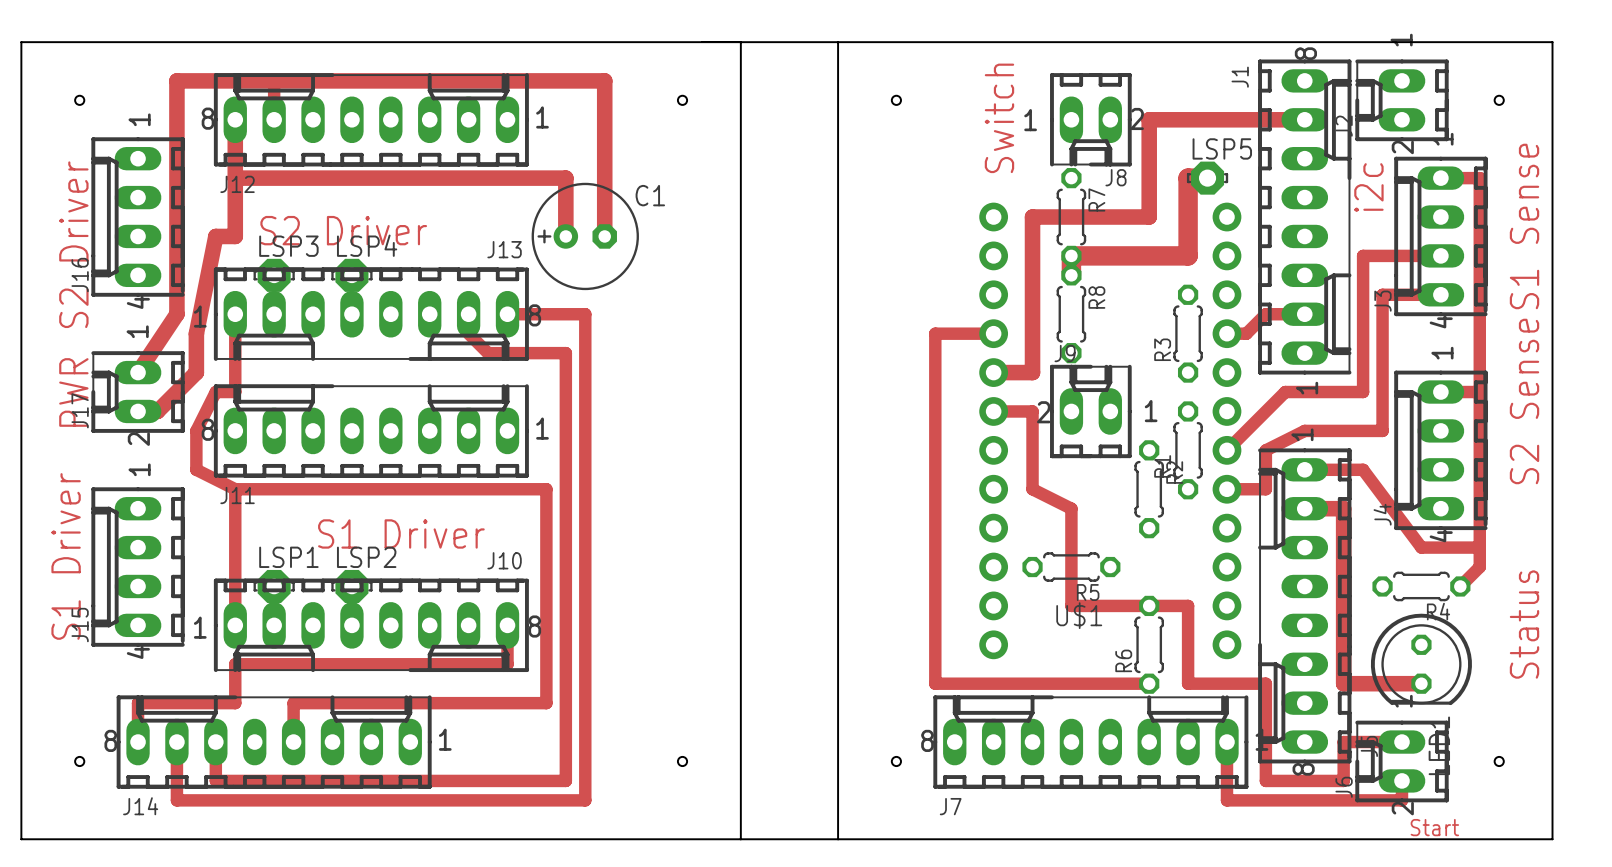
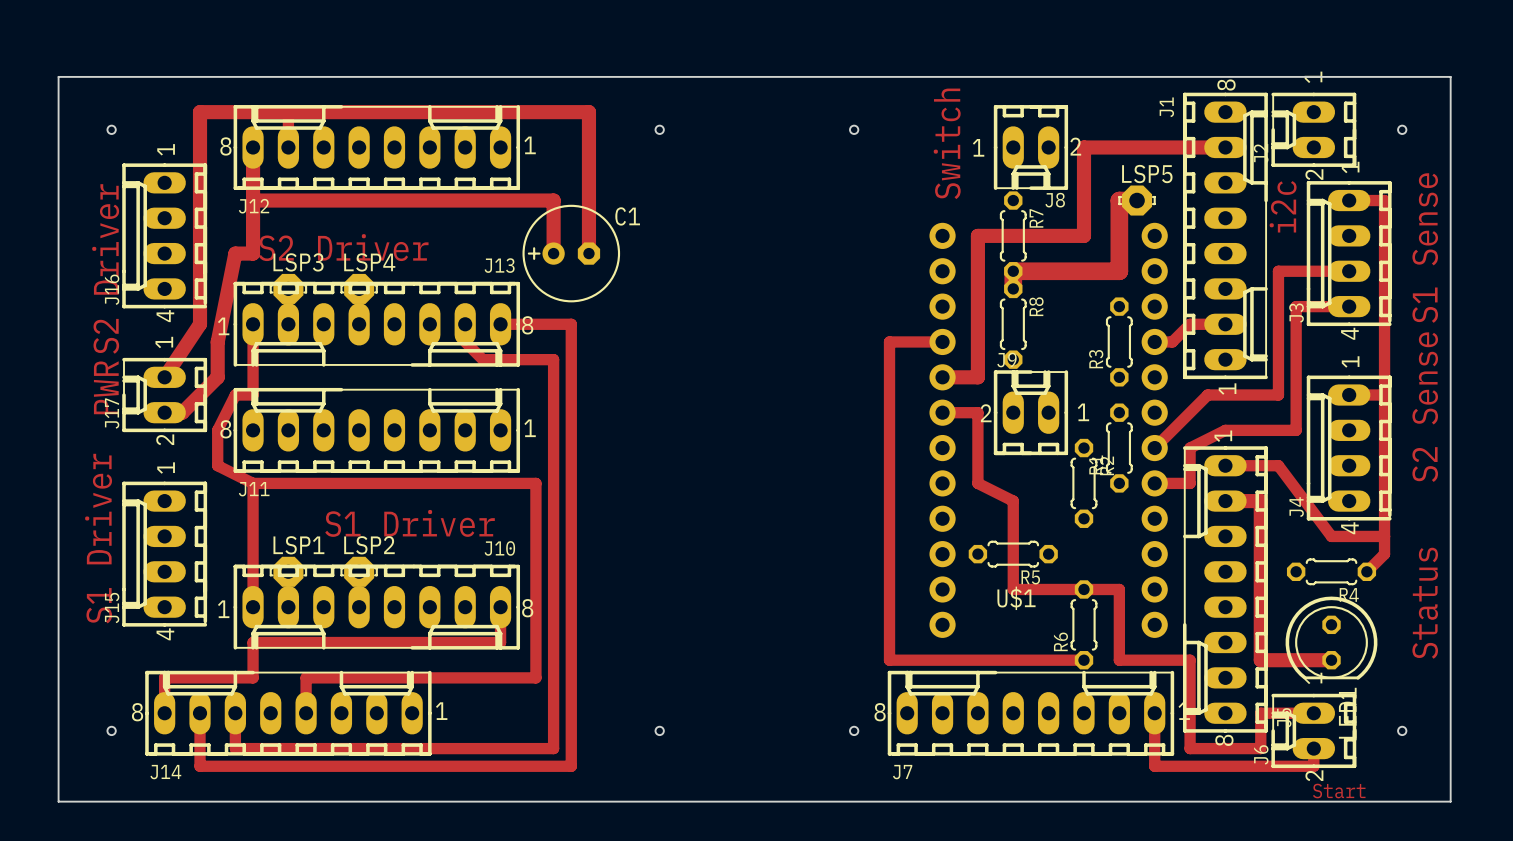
board edge: (701, 42) (740, 42) (740, 839) -> none
board edge: (838, 42) (838, 839) -> none

